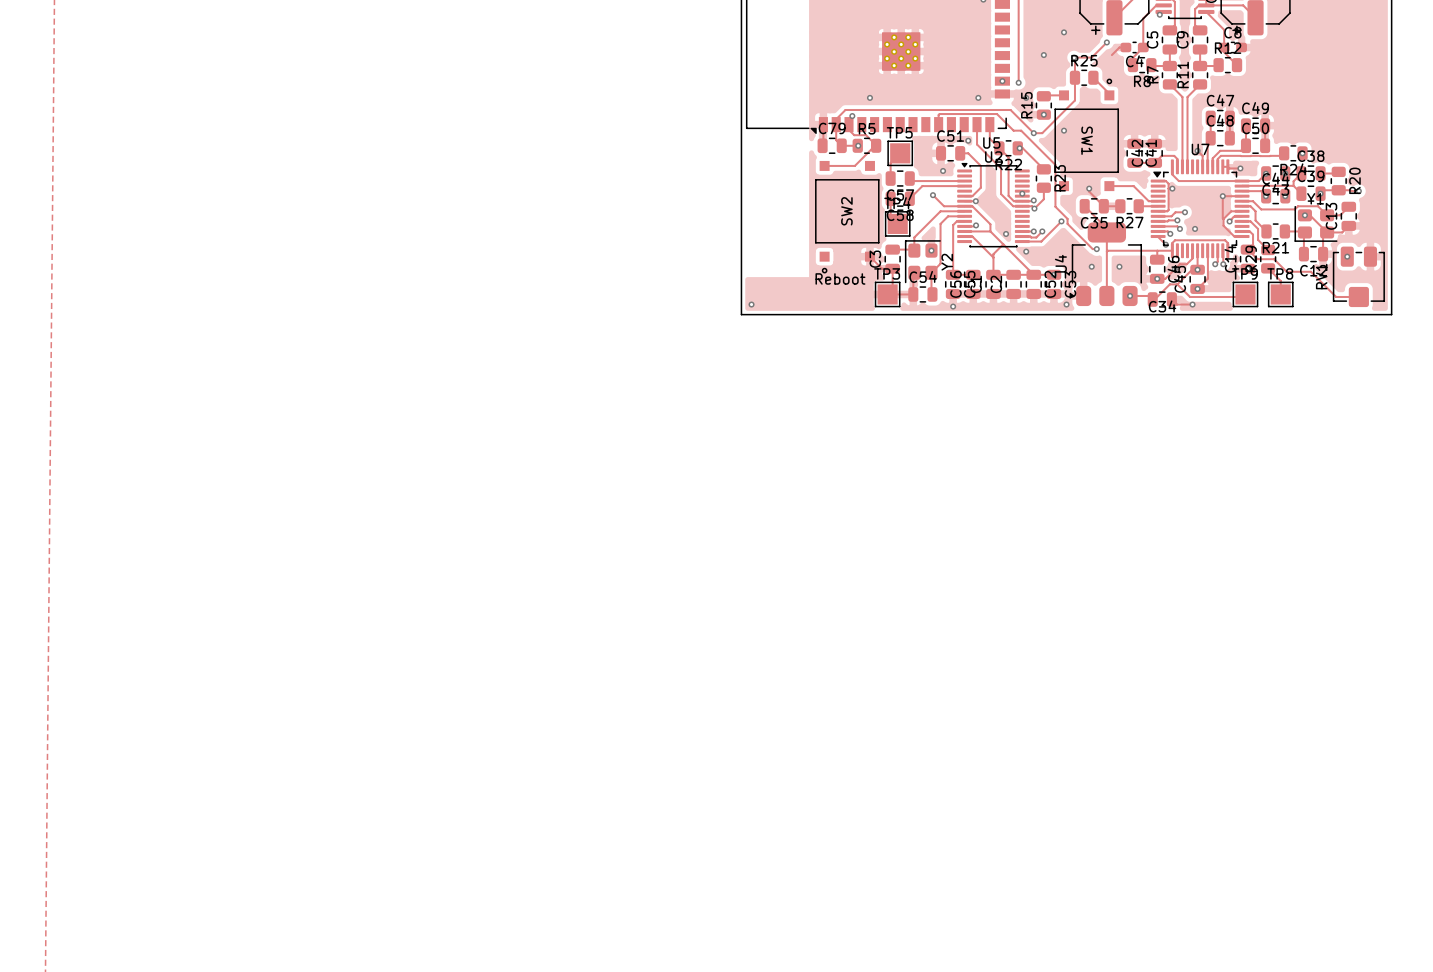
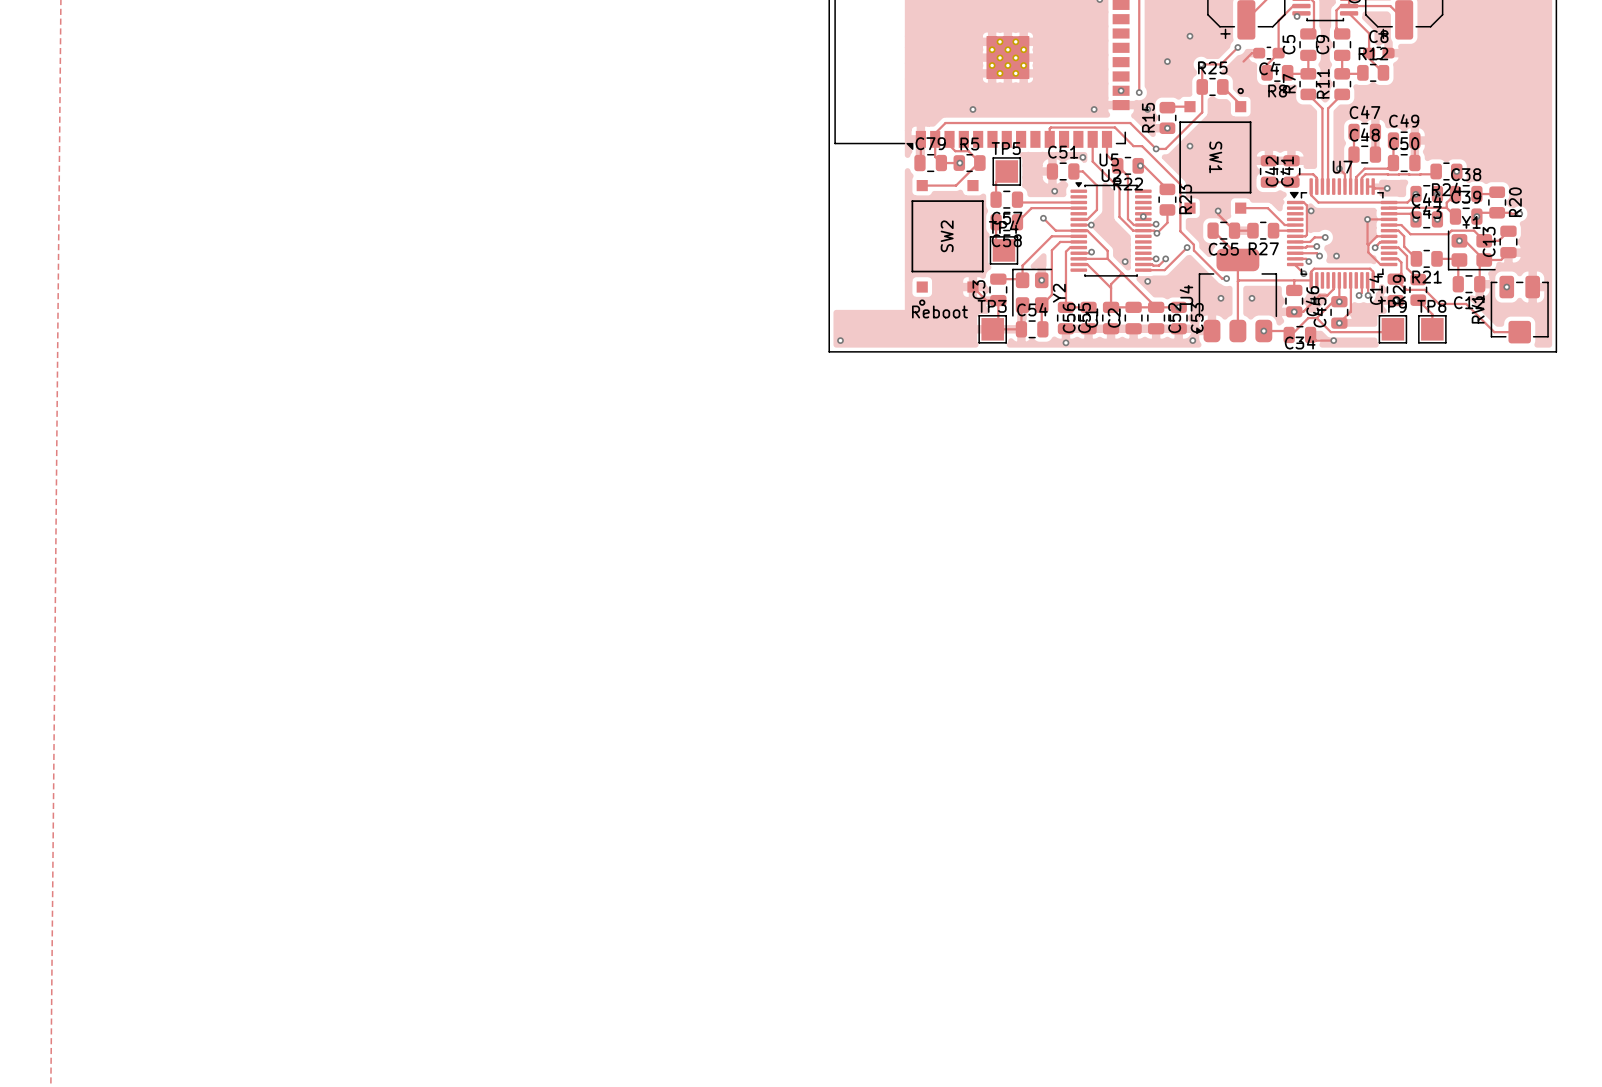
via: (852, 116) -> none

